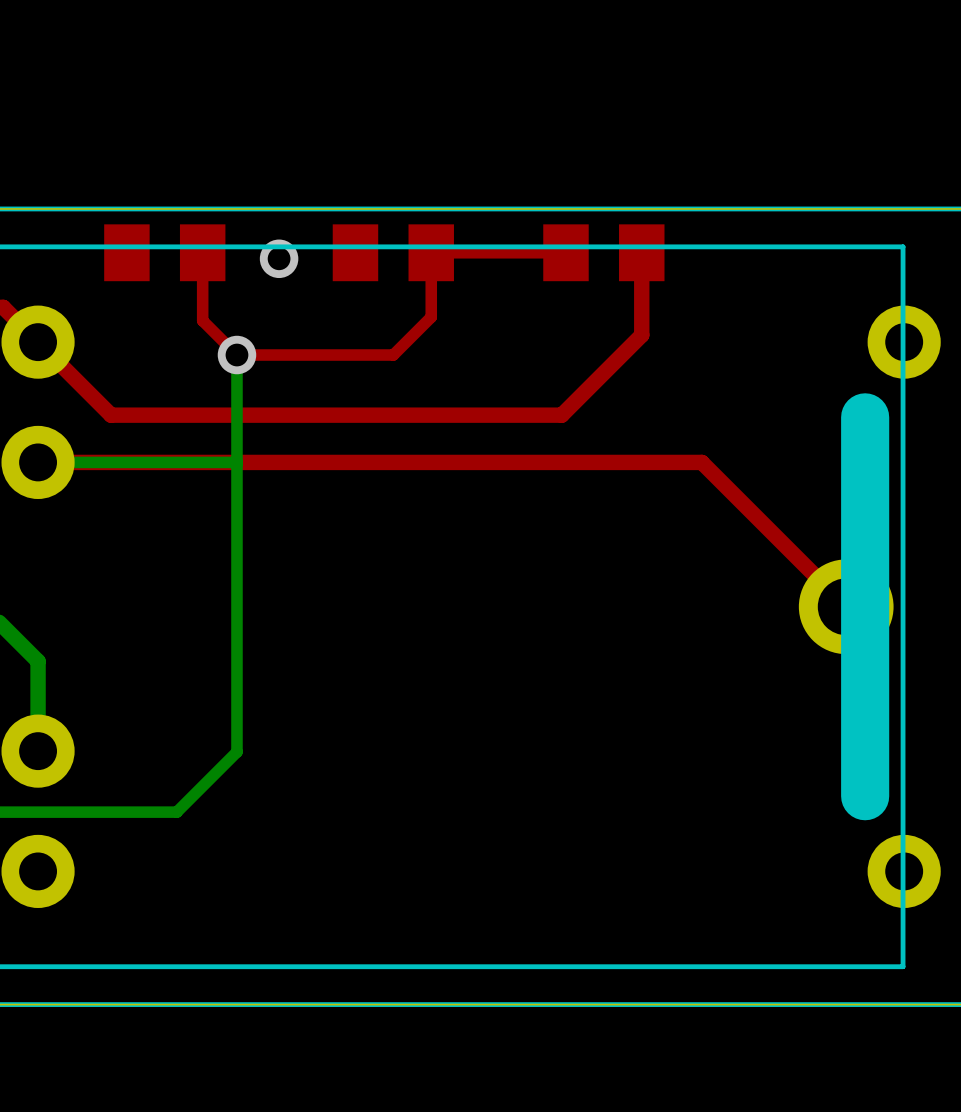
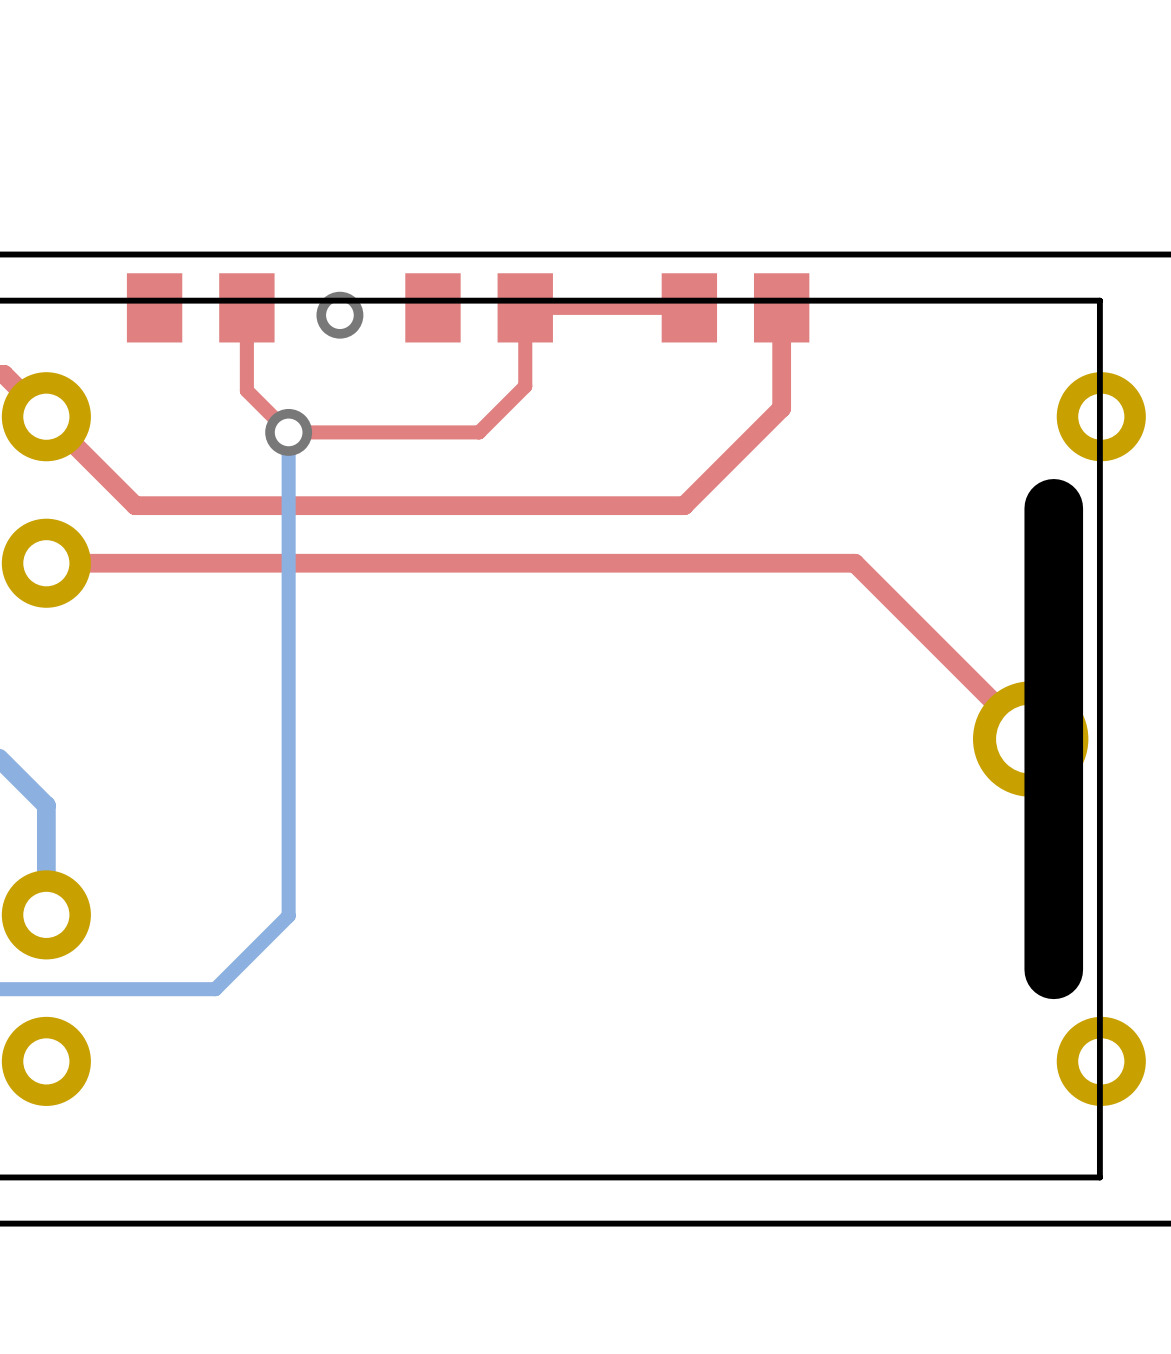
bottom track: (236, 462) (38, 462) -> none

